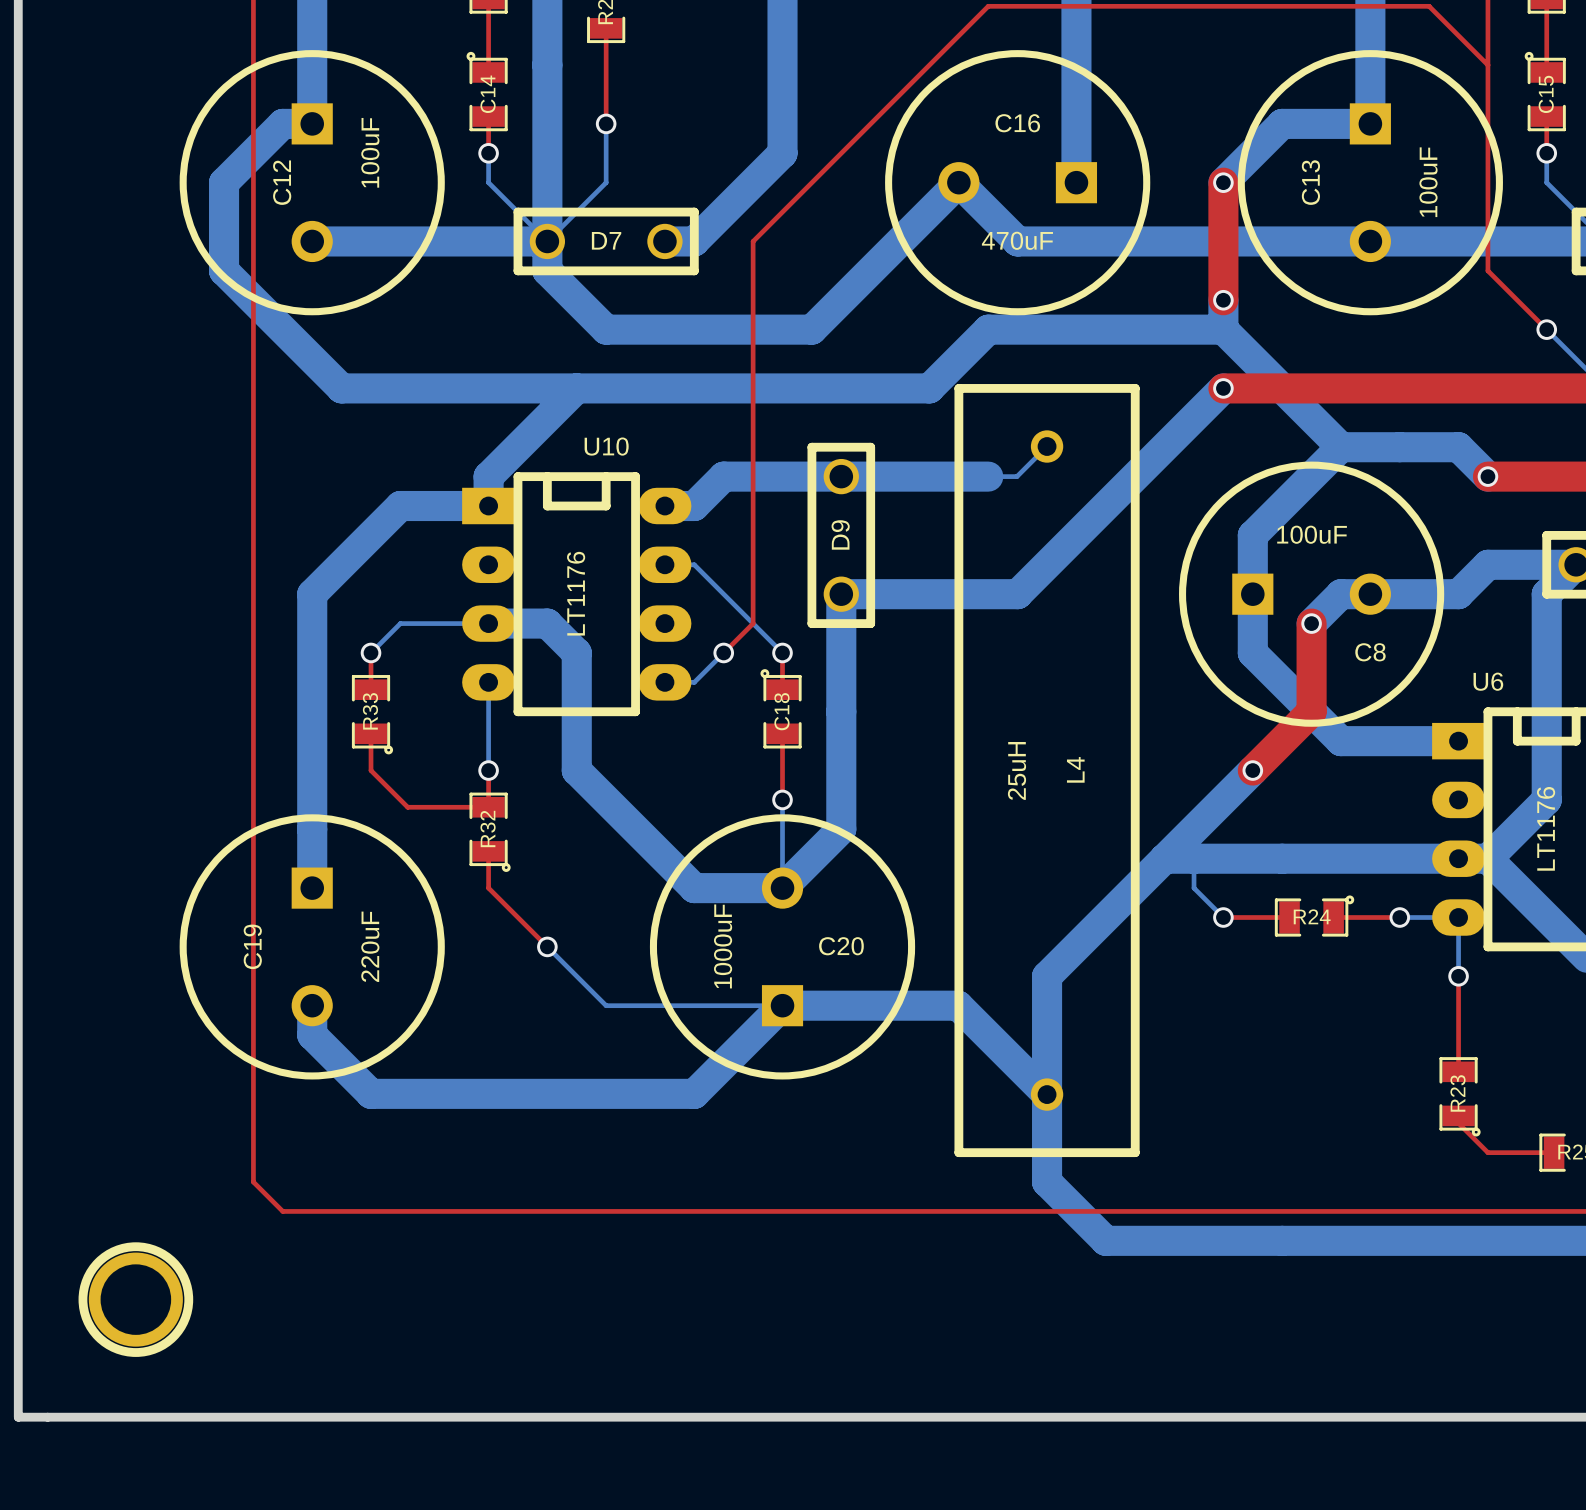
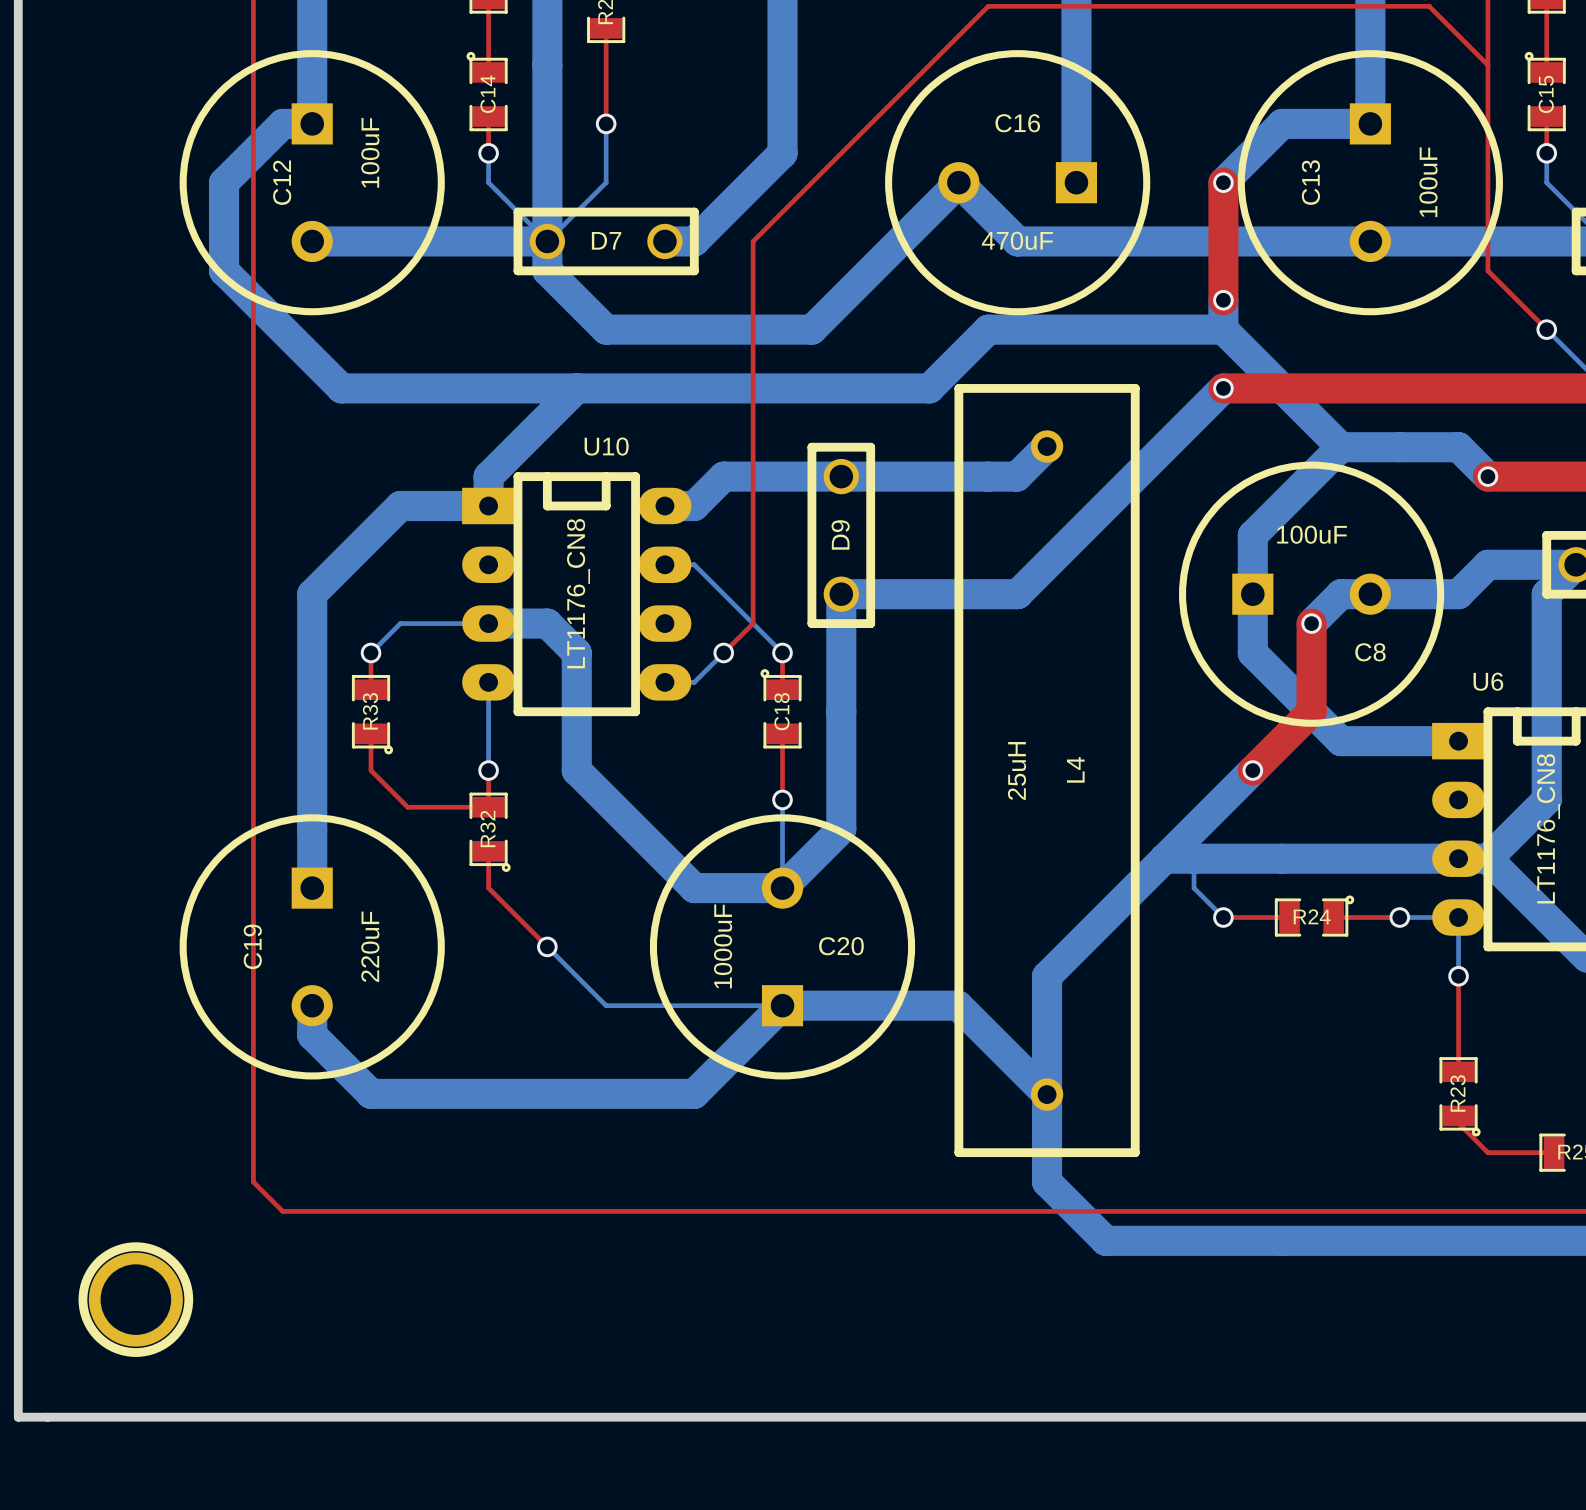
bottom track width: thin (1047, 446) (1016, 476) (988, 476) -> thick (1047, 446) (1016, 476) (988, 476)
U10 value: LT1176 (576, 593) -> LT1176_CN8 (578, 593)
U6 value: LT1176 (1546, 828) -> LT1176_CN8 (1548, 828)

